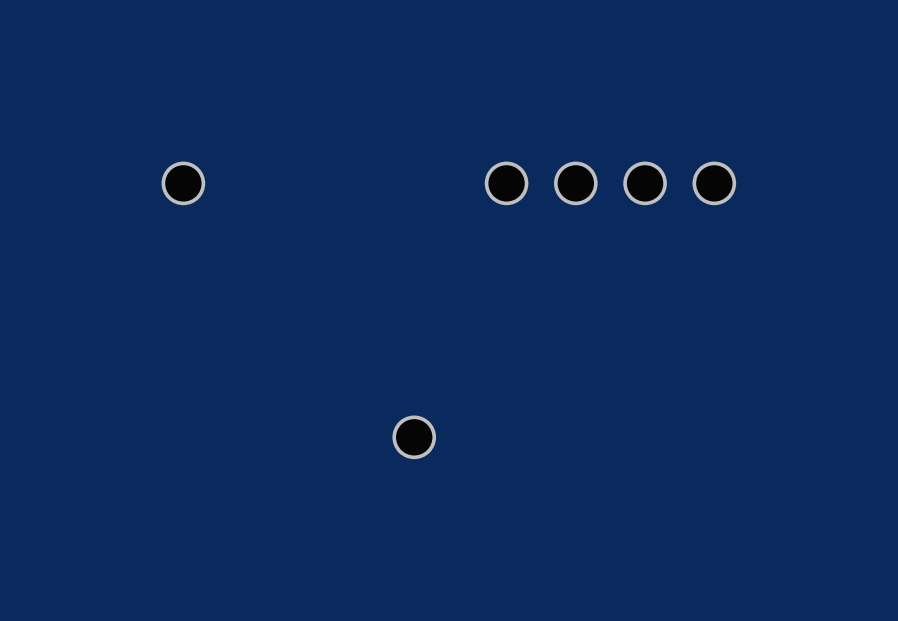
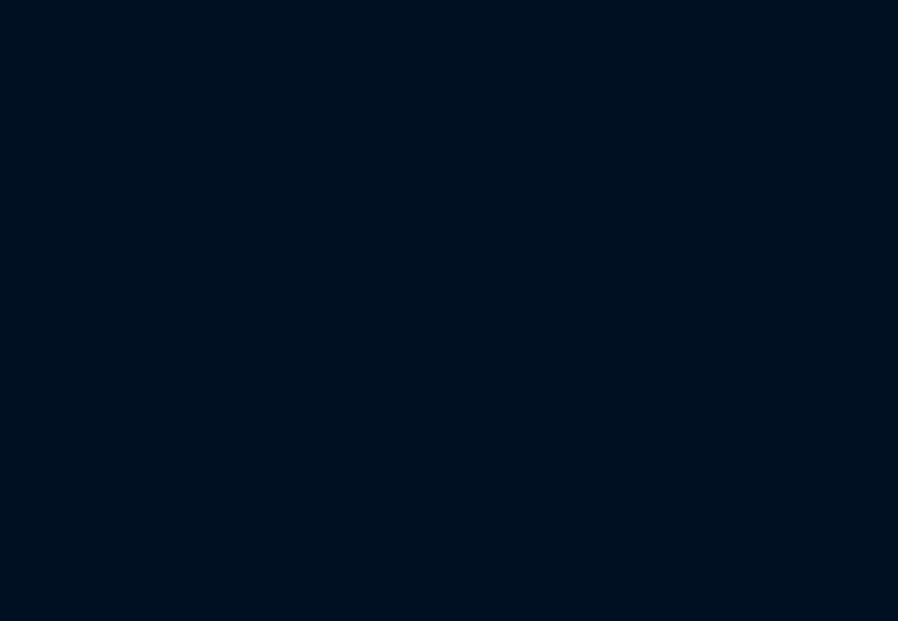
via: (183, 183) -> none
via: (506, 183) -> none
via: (575, 183) -> none
via: (645, 183) -> none
via: (714, 183) -> none
via: (414, 437) -> none

